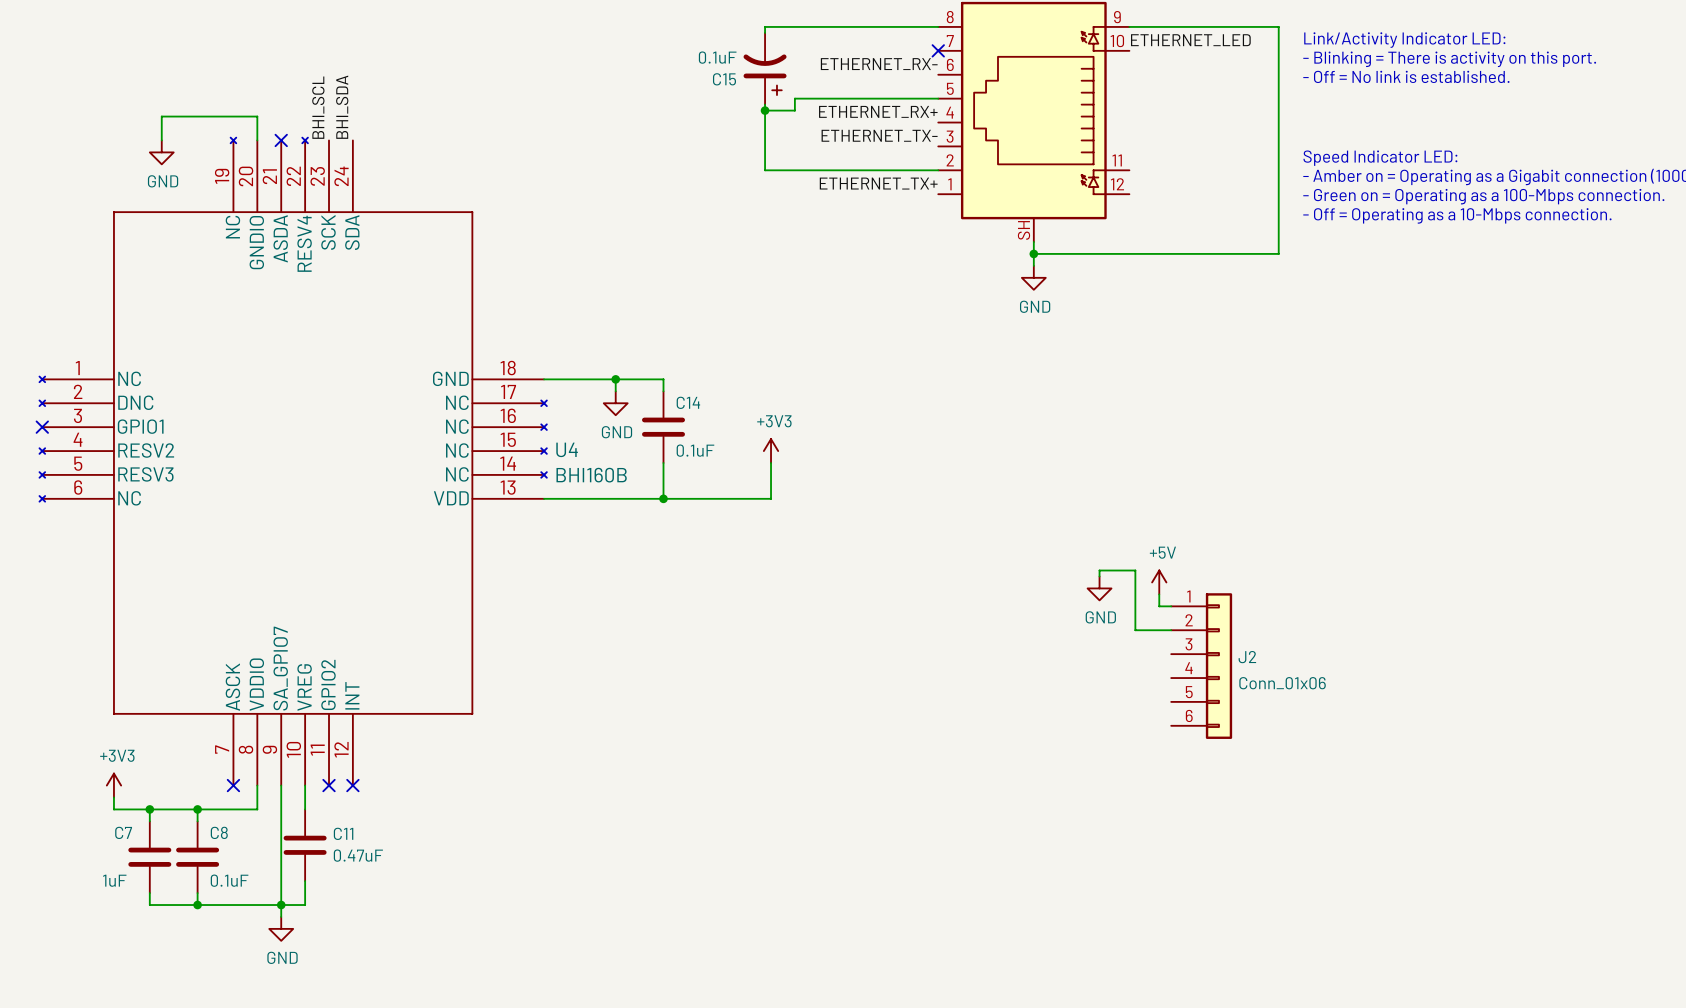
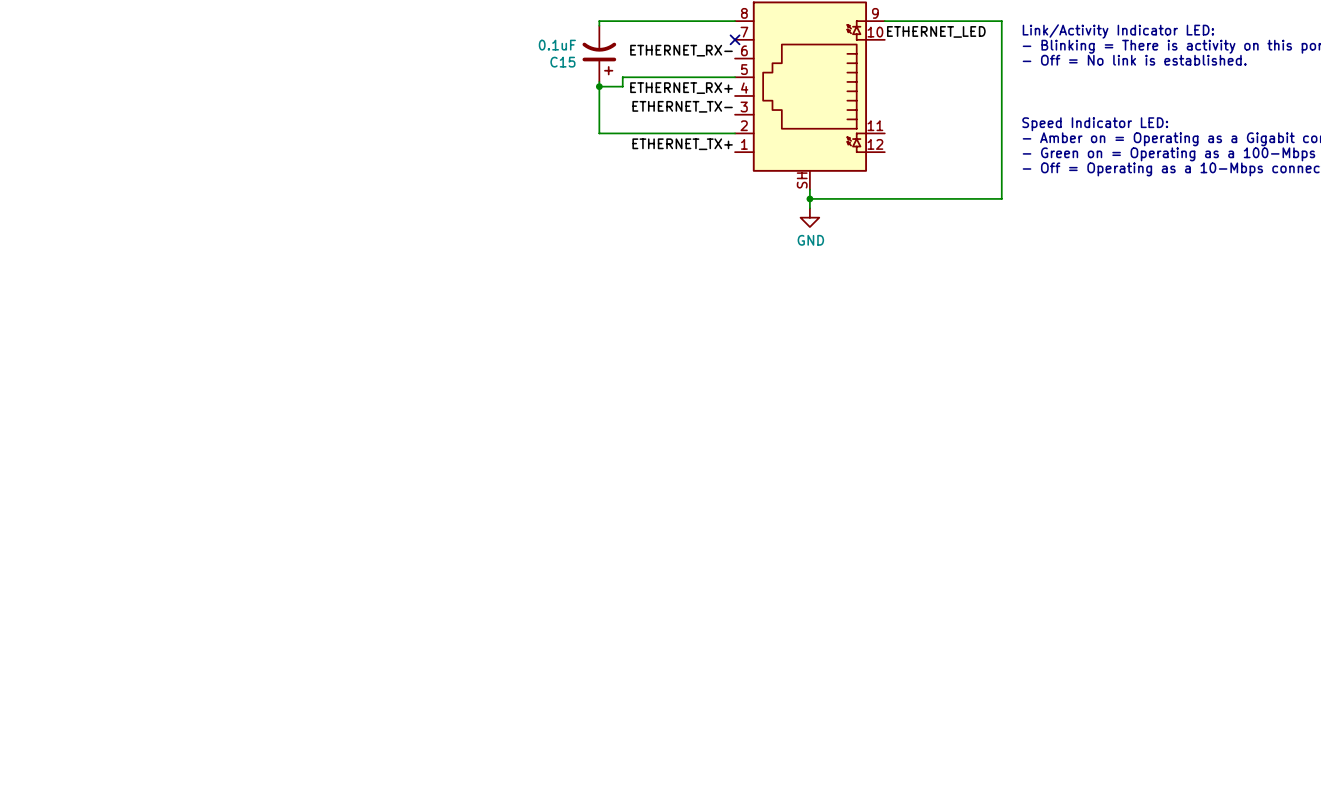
label: BHI_SCL (318, 107) -> none
label: BHI_SDA (342, 107) -> none
wire: (161, 140) (161, 116) (257, 116) (257, 140) -> none
no-connect mark: (281, 140) -> none
power symbol: GND (161, 152) -> none
wire: (544, 379) (663, 379) (663, 391) -> none
wire: (615, 379) (615, 391) -> none
junction: (615, 379) -> none
power symbol: GND (615, 403) -> none
no-connect mark: (42, 427) -> none
C14: 0.1uF (663, 427) -> none
power symbol: +3V3 (771, 451) -> none
U4: BHI160B (293, 461) -> none
wire: (663, 463) (663, 498) -> none
wire: (771, 463) (771, 498) (544, 498) -> none
junction: (663, 498) -> none
wire: (1099, 576) (1099, 570) (1135, 570) (1135, 630) (1171, 630) -> none
power symbol: +5V (1159, 582) -> none
power symbol: GND (1099, 588) -> none
wire: (1159, 594) (1159, 606) (1171, 606) -> none
J2: Conn_01x06 (1201, 666) -> none
power symbol: +3V3 (113, 785) -> none
no-connect mark: (233, 785) -> none
wire: (257, 785) (257, 809) (113, 809) (113, 797) -> none
wire: (281, 785) (281, 916) -> none
wire: (305, 785) (305, 809) -> none
no-connect mark: (329, 785) -> none
no-connect mark: (352, 785) -> none
wire: (149, 809) (149, 821) -> none
junction: (149, 809) -> none
wire: (197, 809) (197, 821) -> none
junction: (197, 809) -> none
C11: 0.47uF (305, 845) -> none
C7: 1uF (149, 857) -> none
C8: 0.1uF (197, 857) -> none
wire: (305, 881) (305, 905) (149, 905) (149, 893) -> none
wire: (197, 893) (197, 905) -> none
junction: (197, 905) -> none
junction: (281, 905) -> none
power symbol: GND (281, 928) -> none

